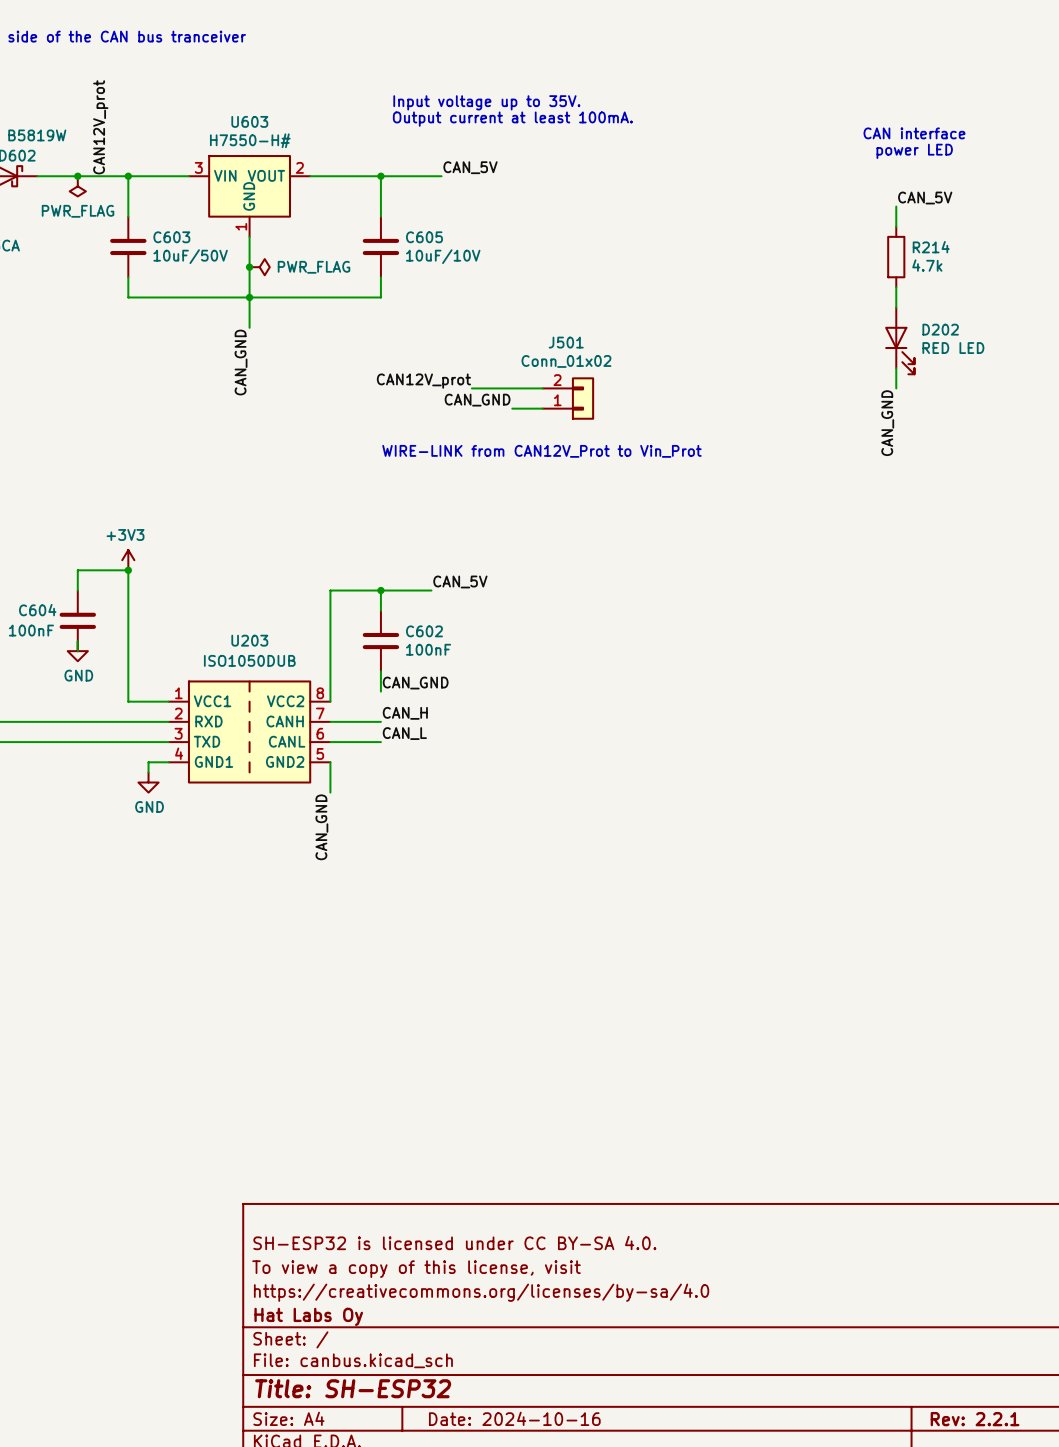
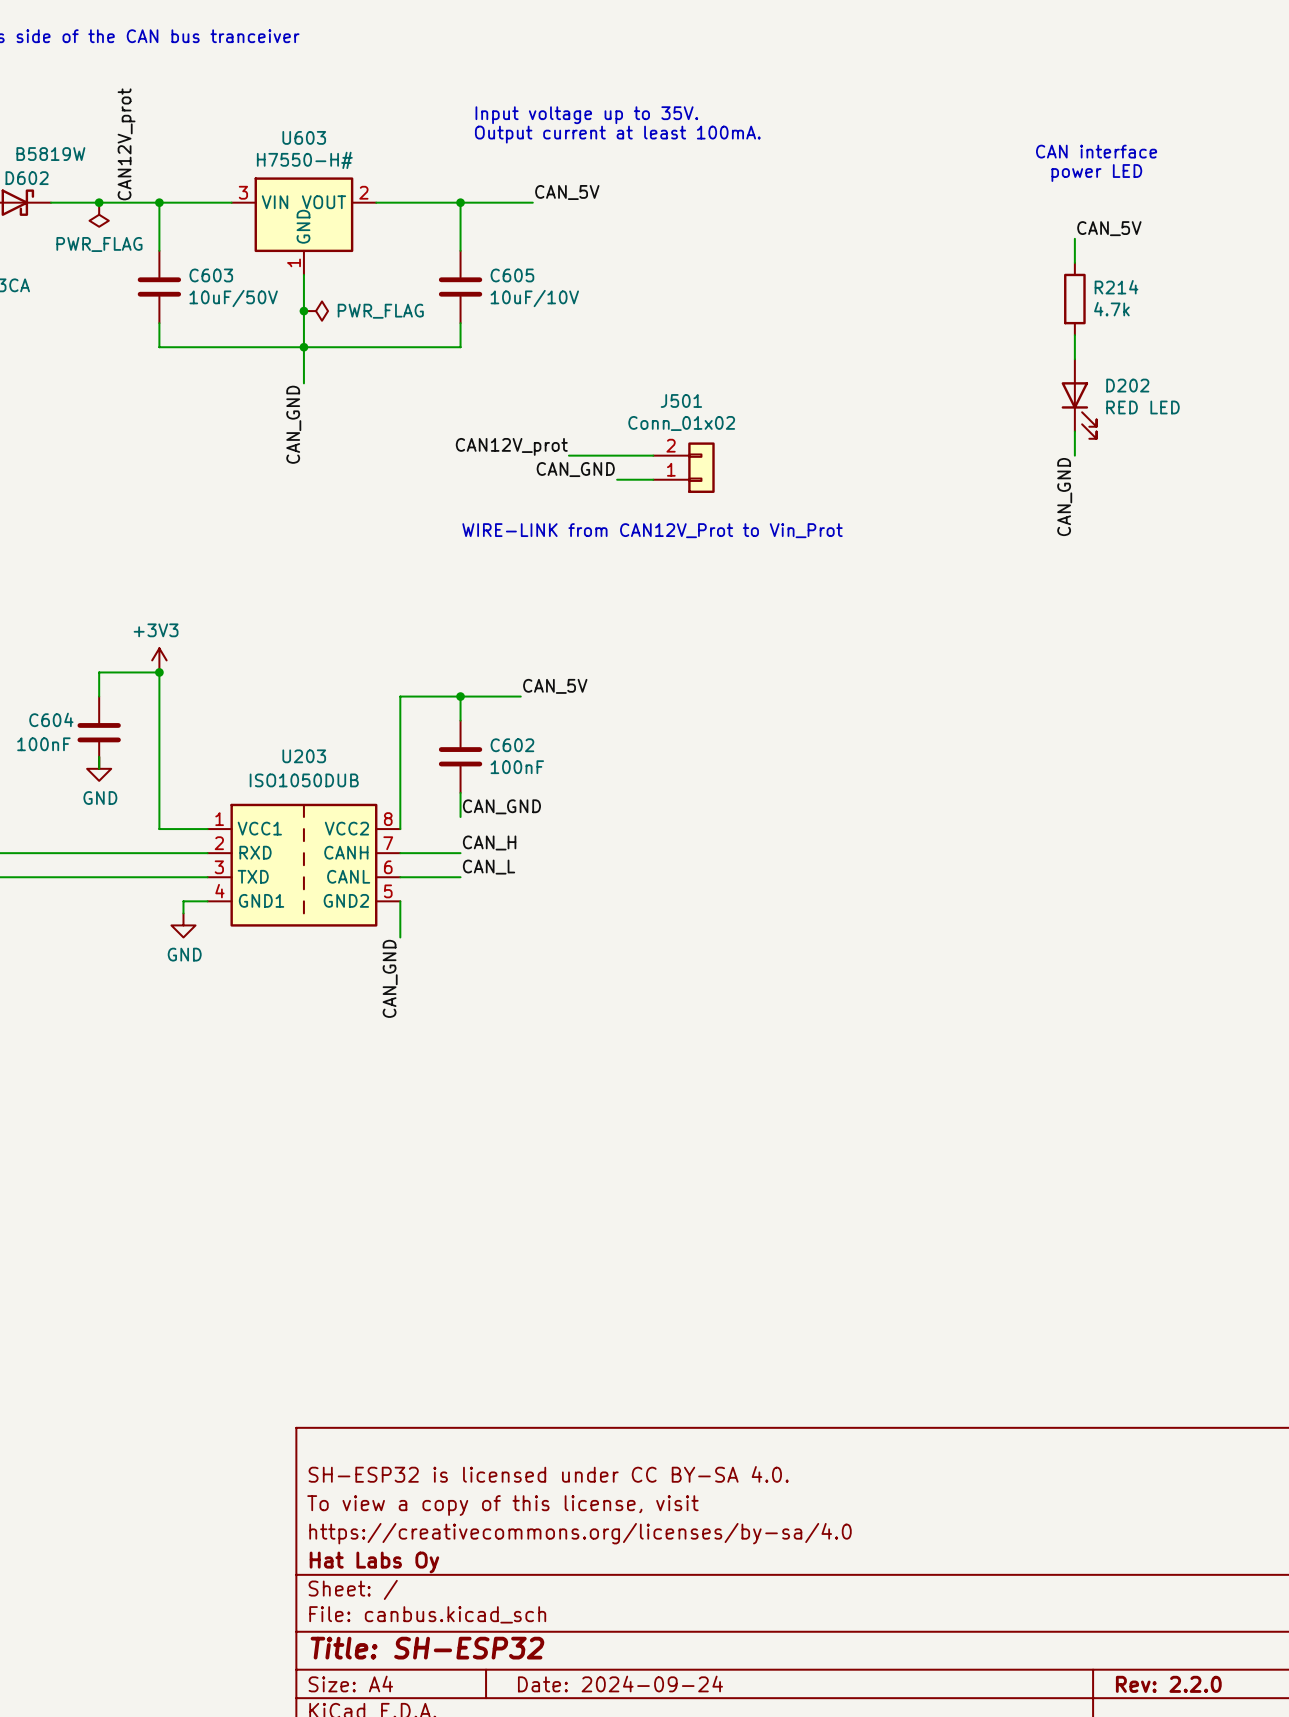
title block: Date: 2024-10-16 (514, 1418) -> Date: 2024-09-24 (620, 1684)
title block: Rev: 2.2.1 (975, 1419) -> Rev: 2.2.0 (1168, 1684)

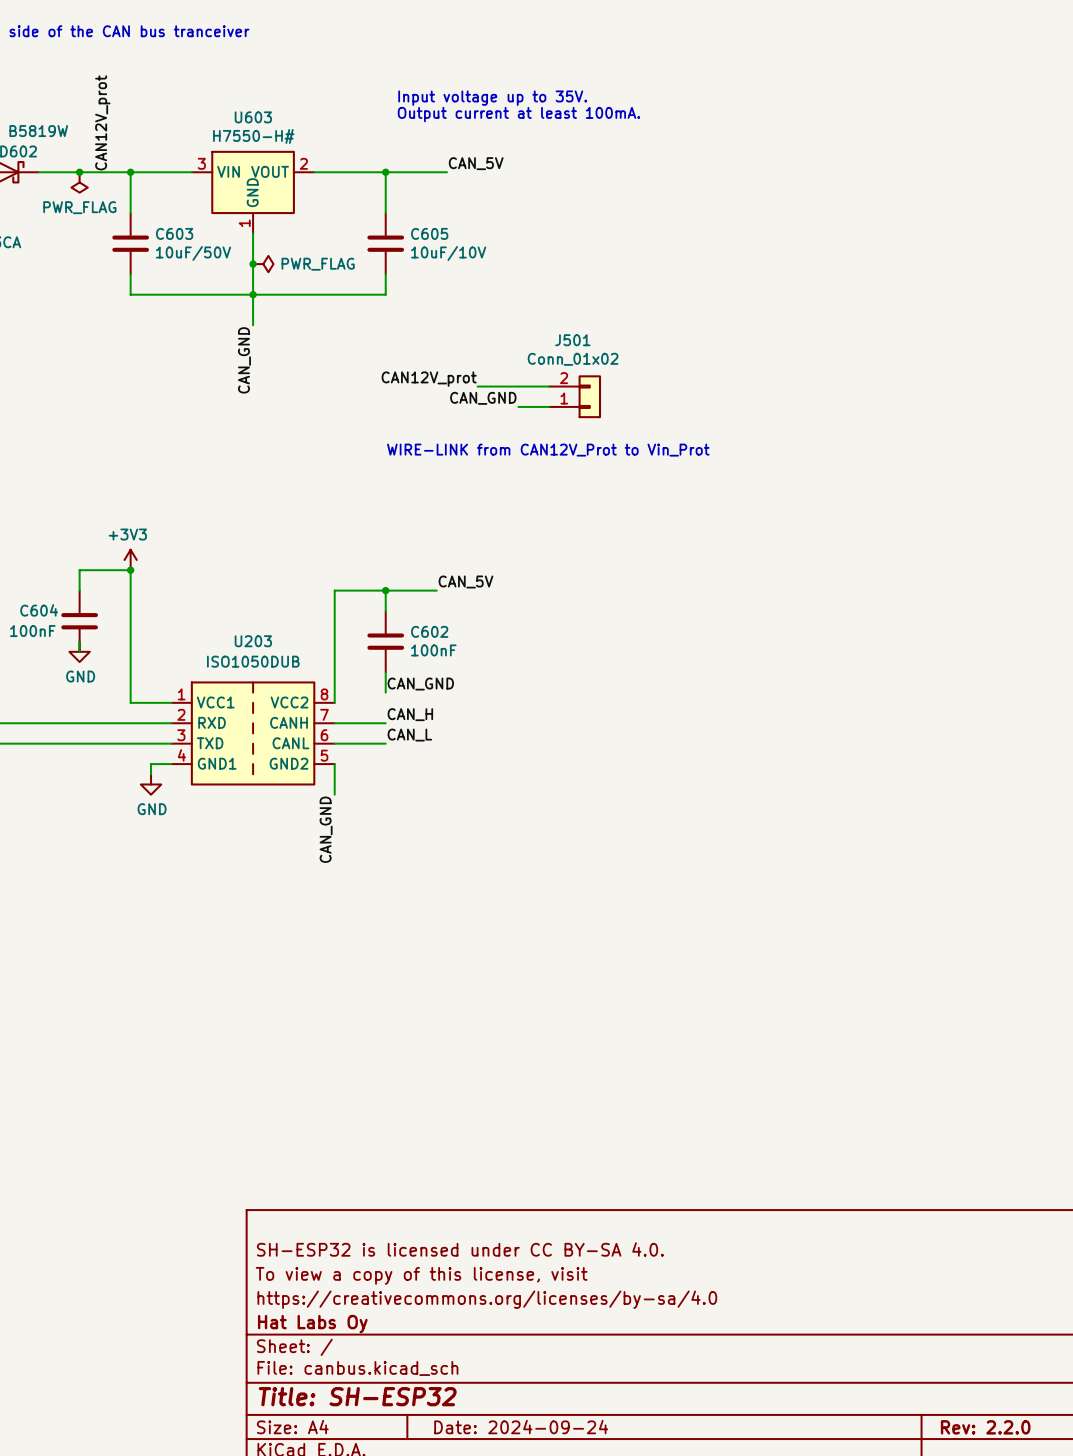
text: CAN interface (1096, 151) -> none
text: power LED (1096, 173) -> none
label: CAN_5V (1109, 228) -> none
wire: (1074, 238) (1074, 262) -> none
R214: 4.7k (1074, 299) -> none
wire: (1074, 335) (1074, 359) -> none
D202: RED LED (1079, 399) -> none
wire: (1074, 431) (1074, 455) -> none
label: CAN_GND (1064, 497) -> none

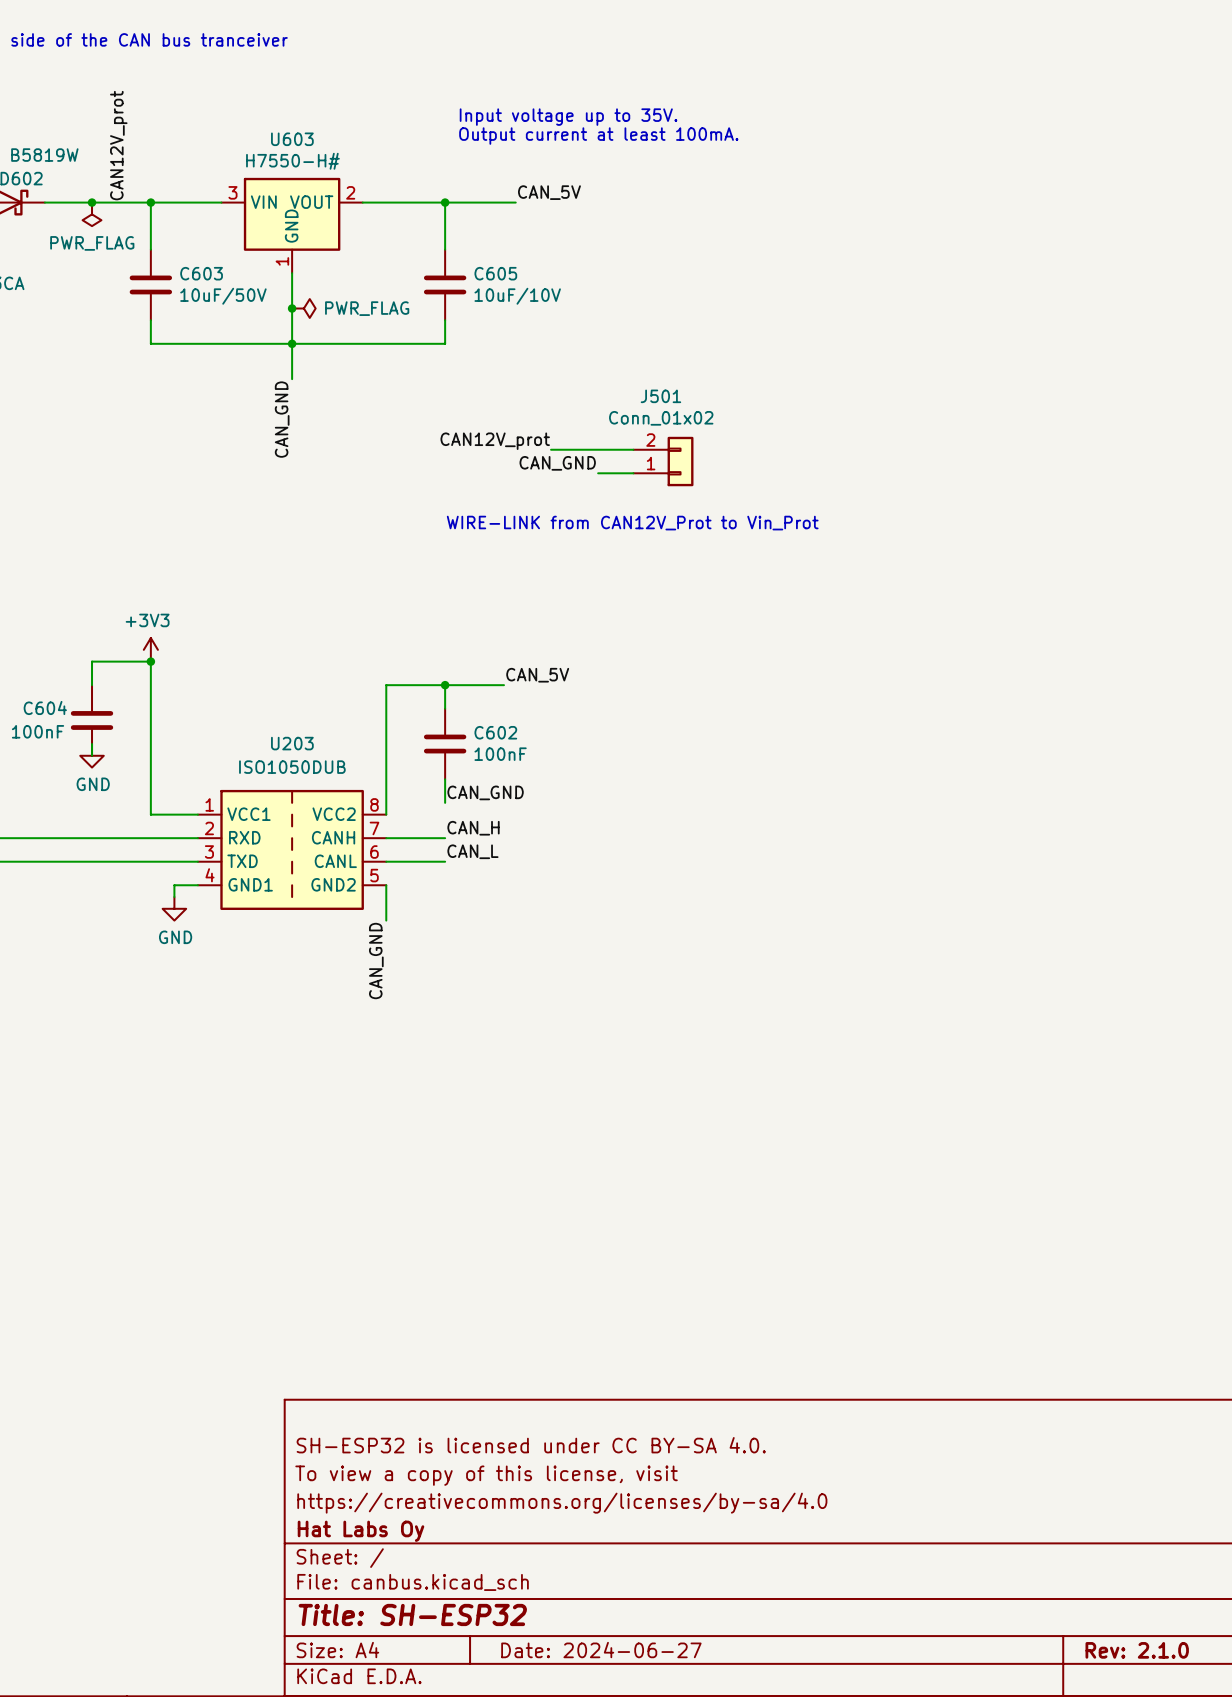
title block: Date: 2024-09-24 (521, 1427) -> Date: 2024-06-27 (601, 1650)
title block: Rev: 2.2.0 (985, 1427) -> Rev: 2.1.0 (1137, 1650)

